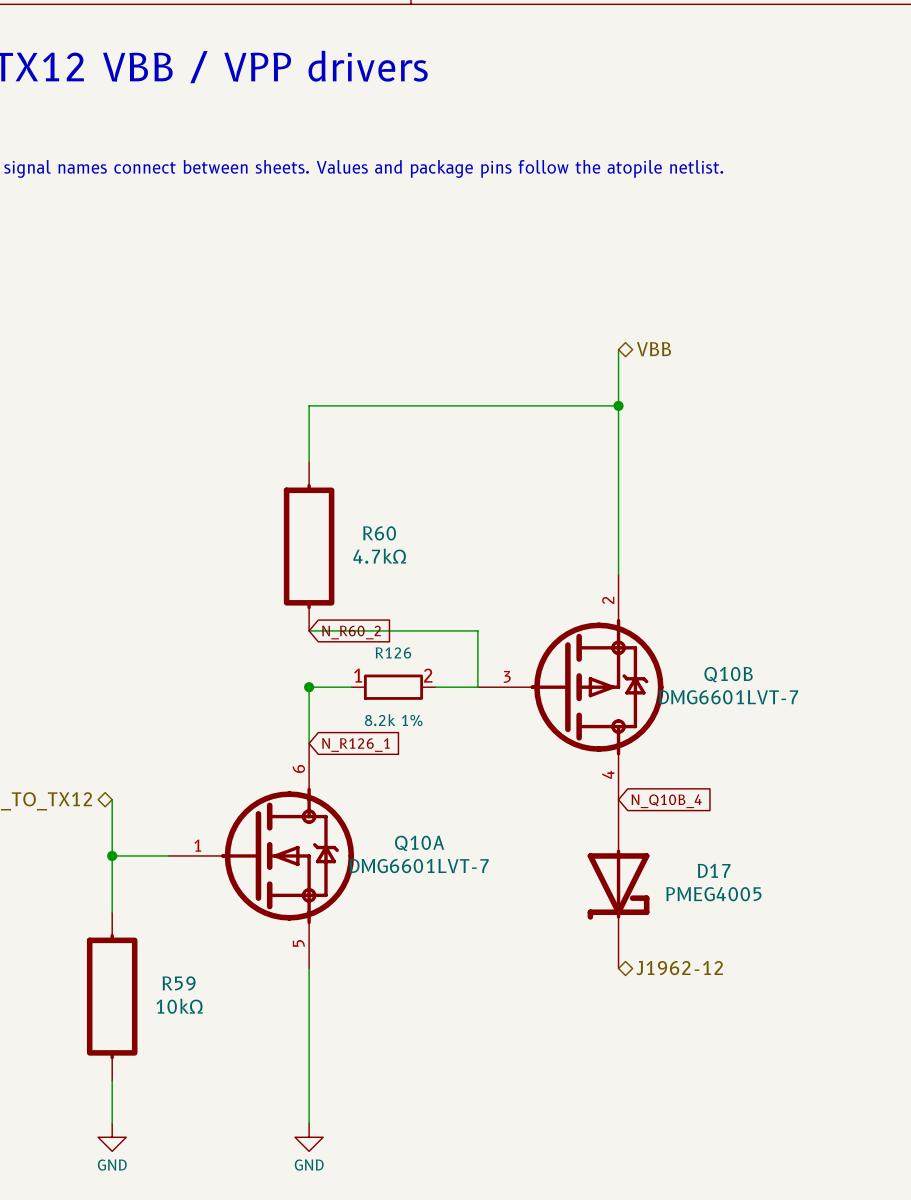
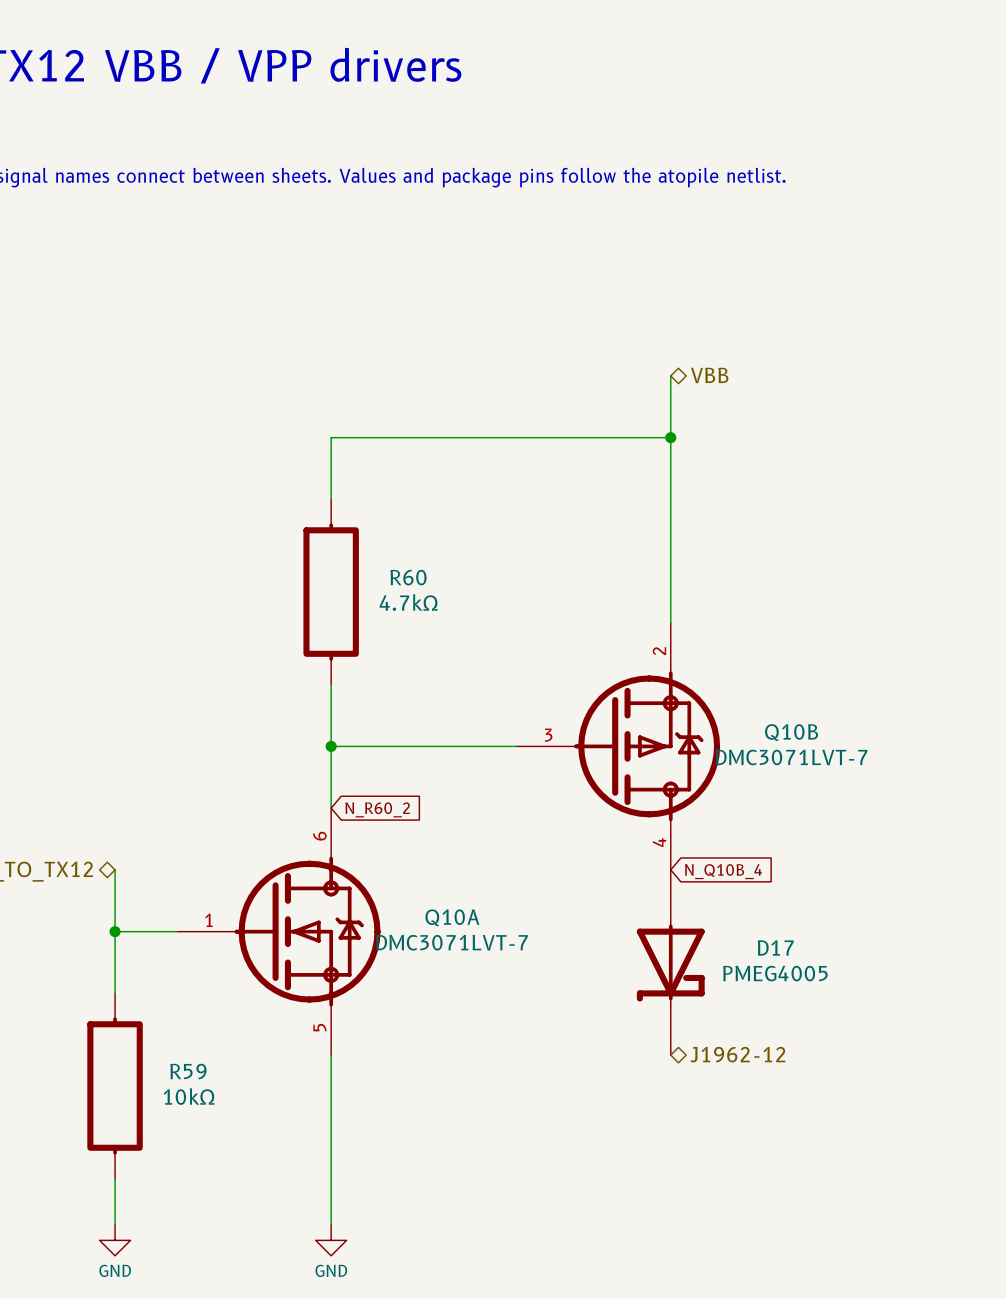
wire: (309, 630) (477, 630) (477, 687) -> (331, 684) (331, 746)
global label: N_R60_2 (351, 632) -> none
wire: none -> (377, 746) (470, 746)
R126: 8.2k 1% (393, 687) -> none
Q10B value: DMG6601LVT-7 (728, 697) -> DMC3071LVT-7 (791, 757)
global label: N_R126_1 (355, 745) -> N_R60_2 (377, 809)
Q10A value: DMG6601LVT-7 (419, 866) -> DMC3071LVT-7 (451, 942)

